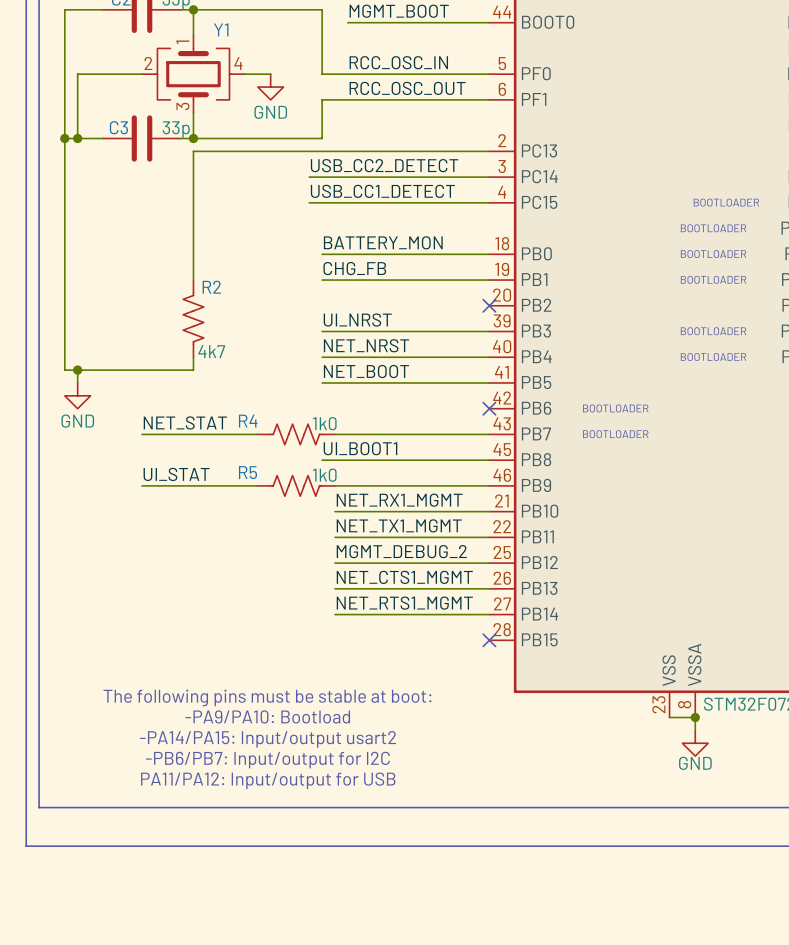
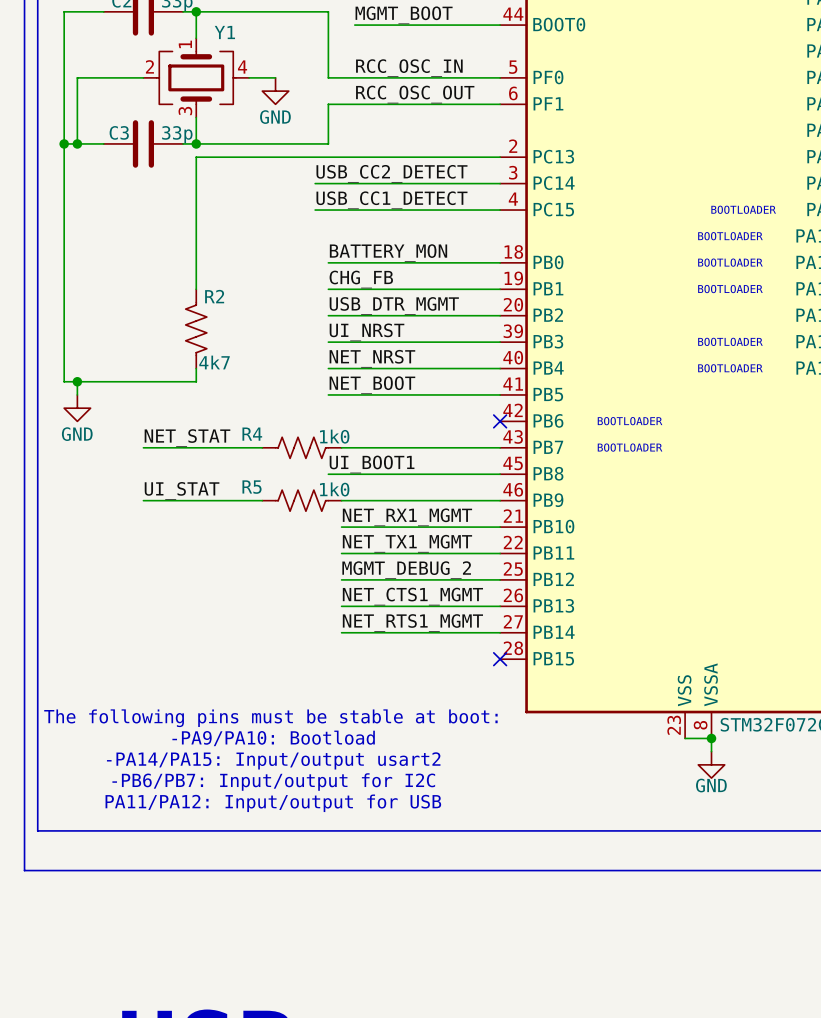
label: none -> USB_DTR_MGMT (394, 305)
wire: none -> (328, 315) (500, 315)
no-connect mark: (489, 305) -> none

